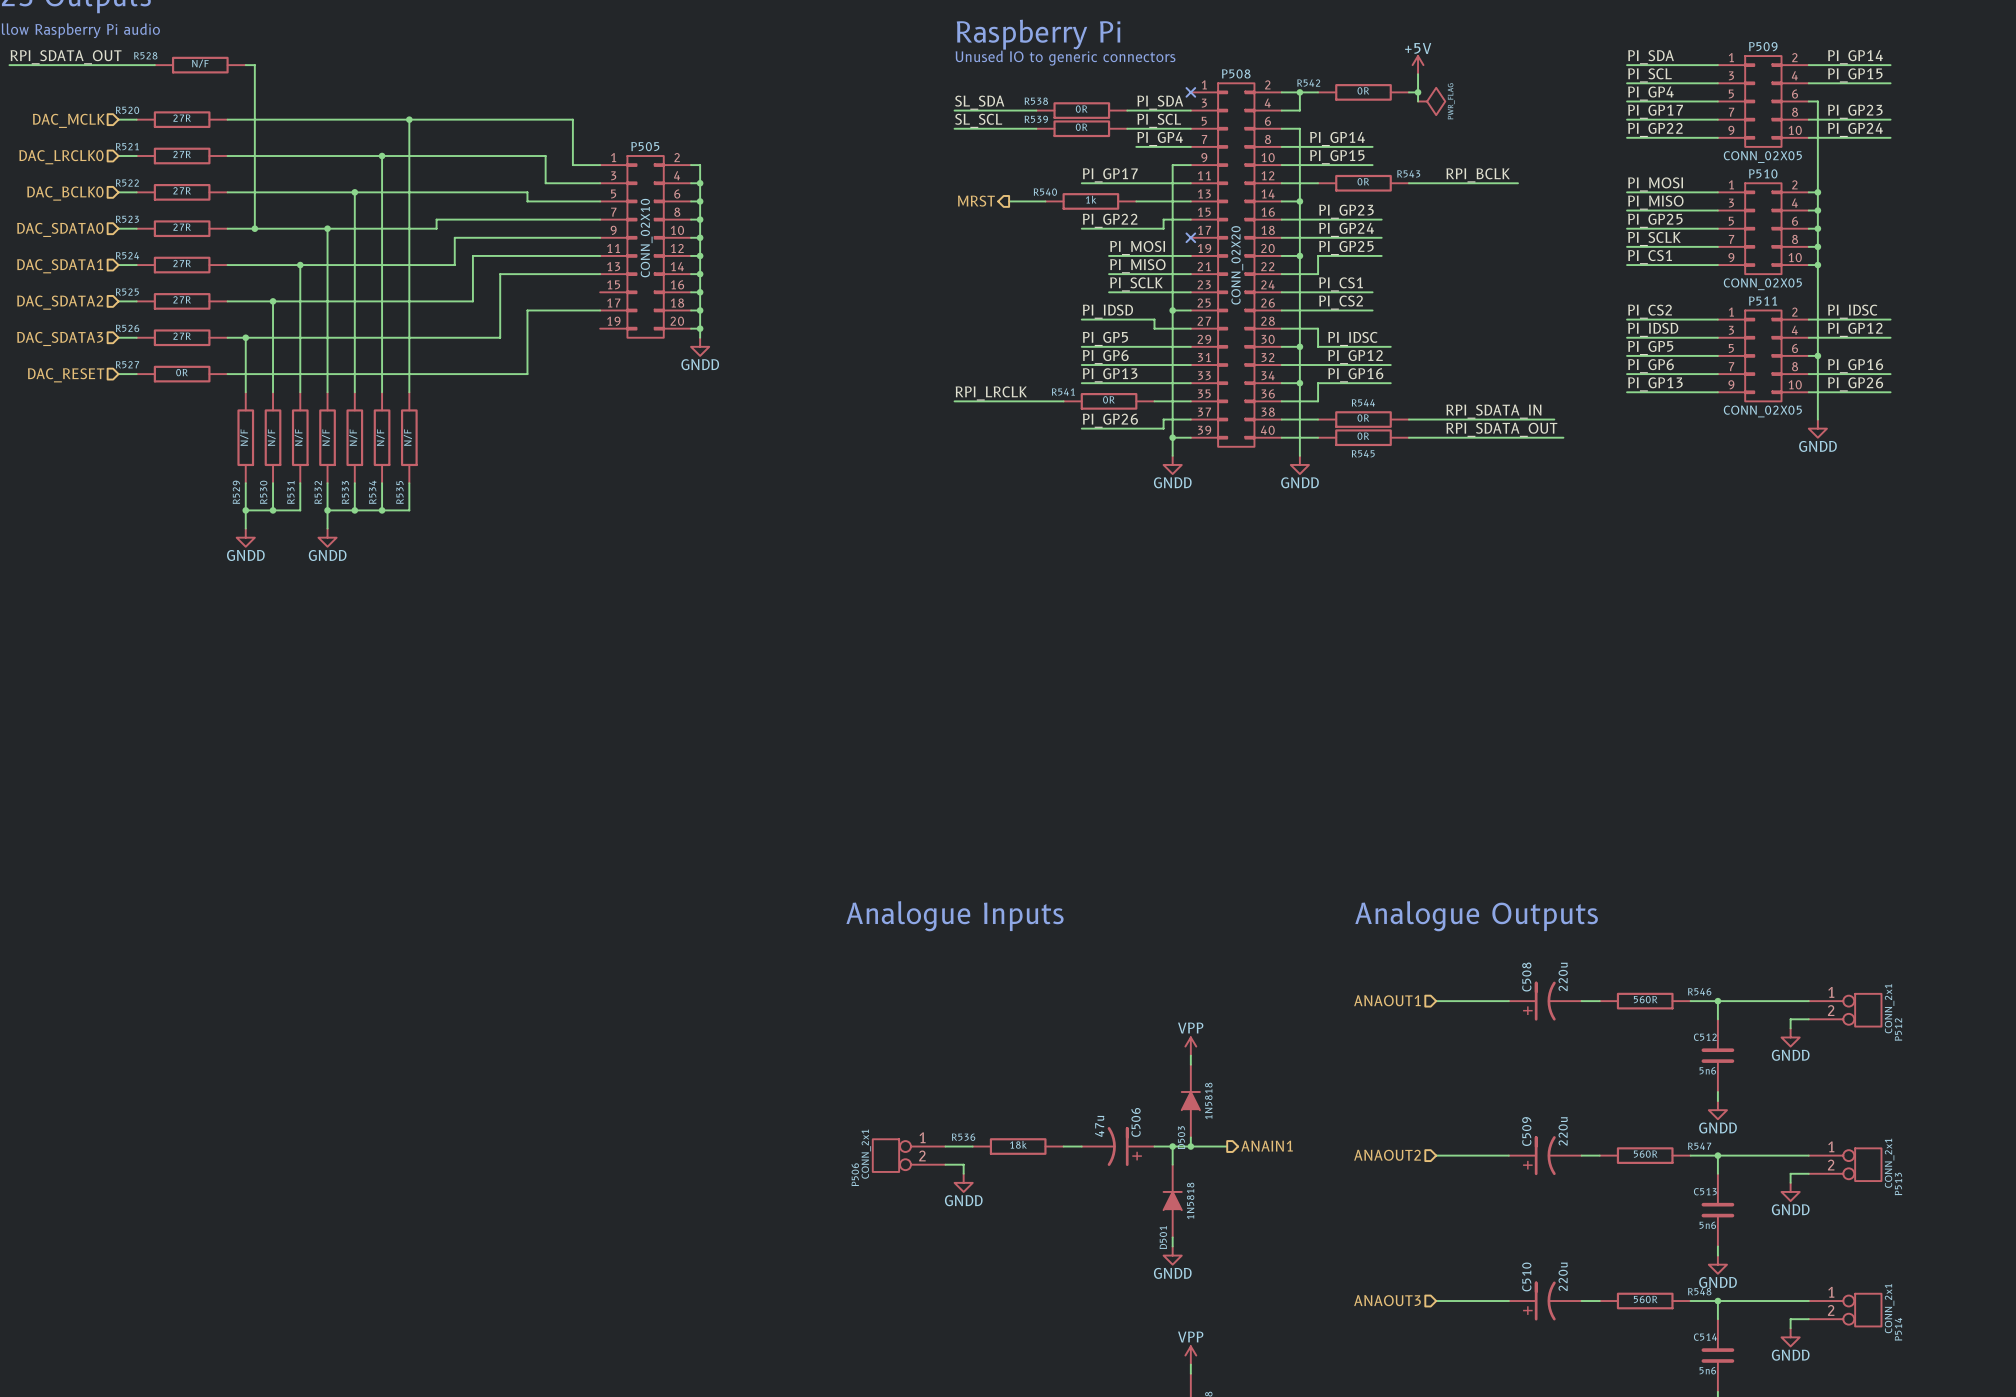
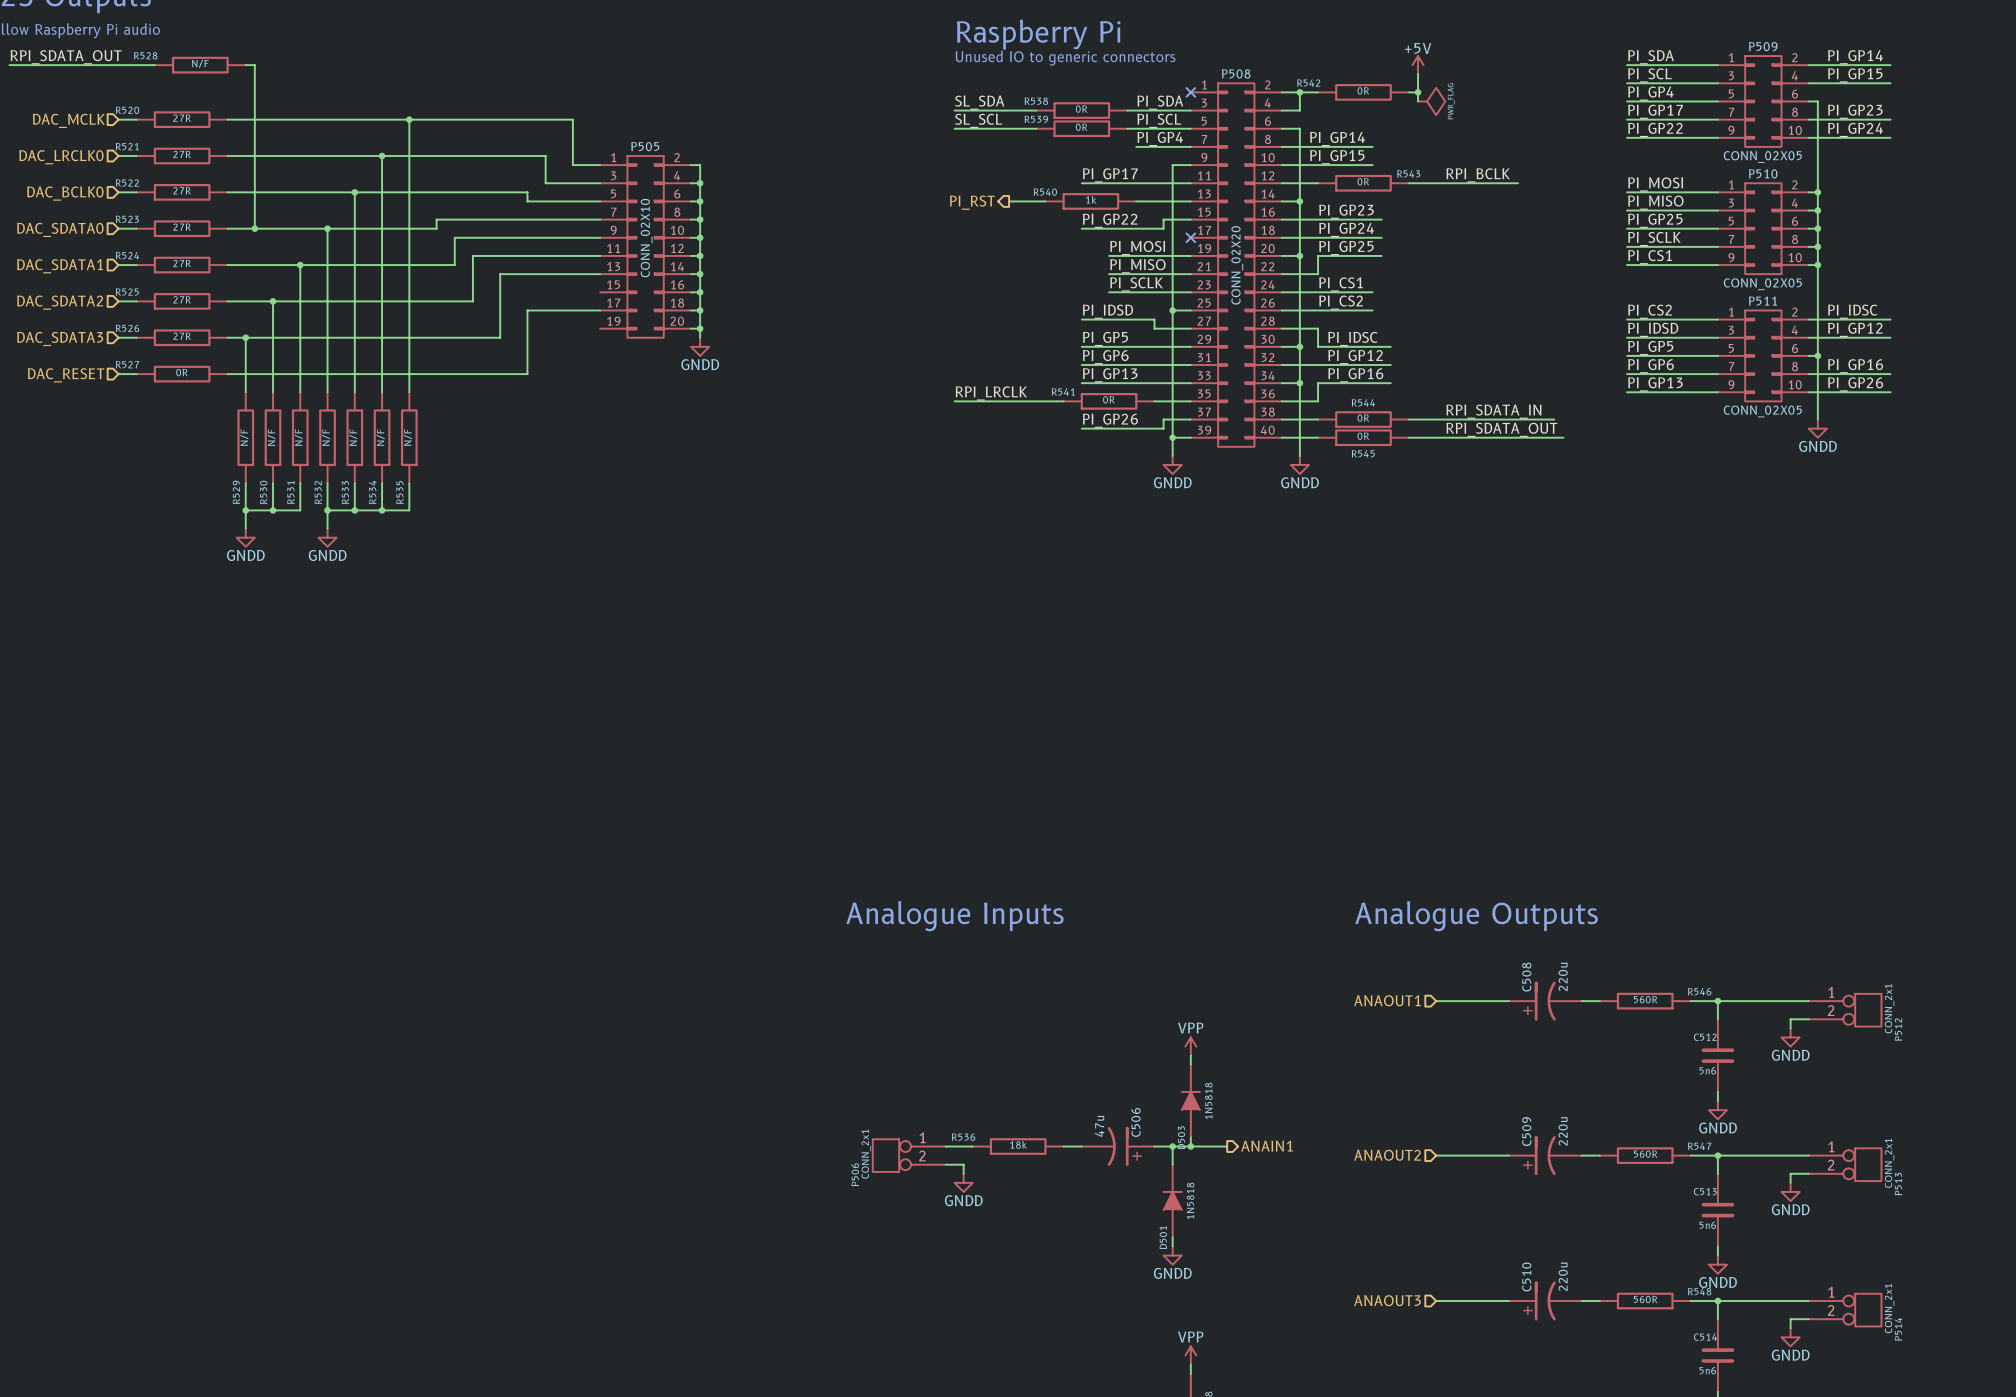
hierarchical label: MRST (976, 201) -> PI_RST (972, 202)

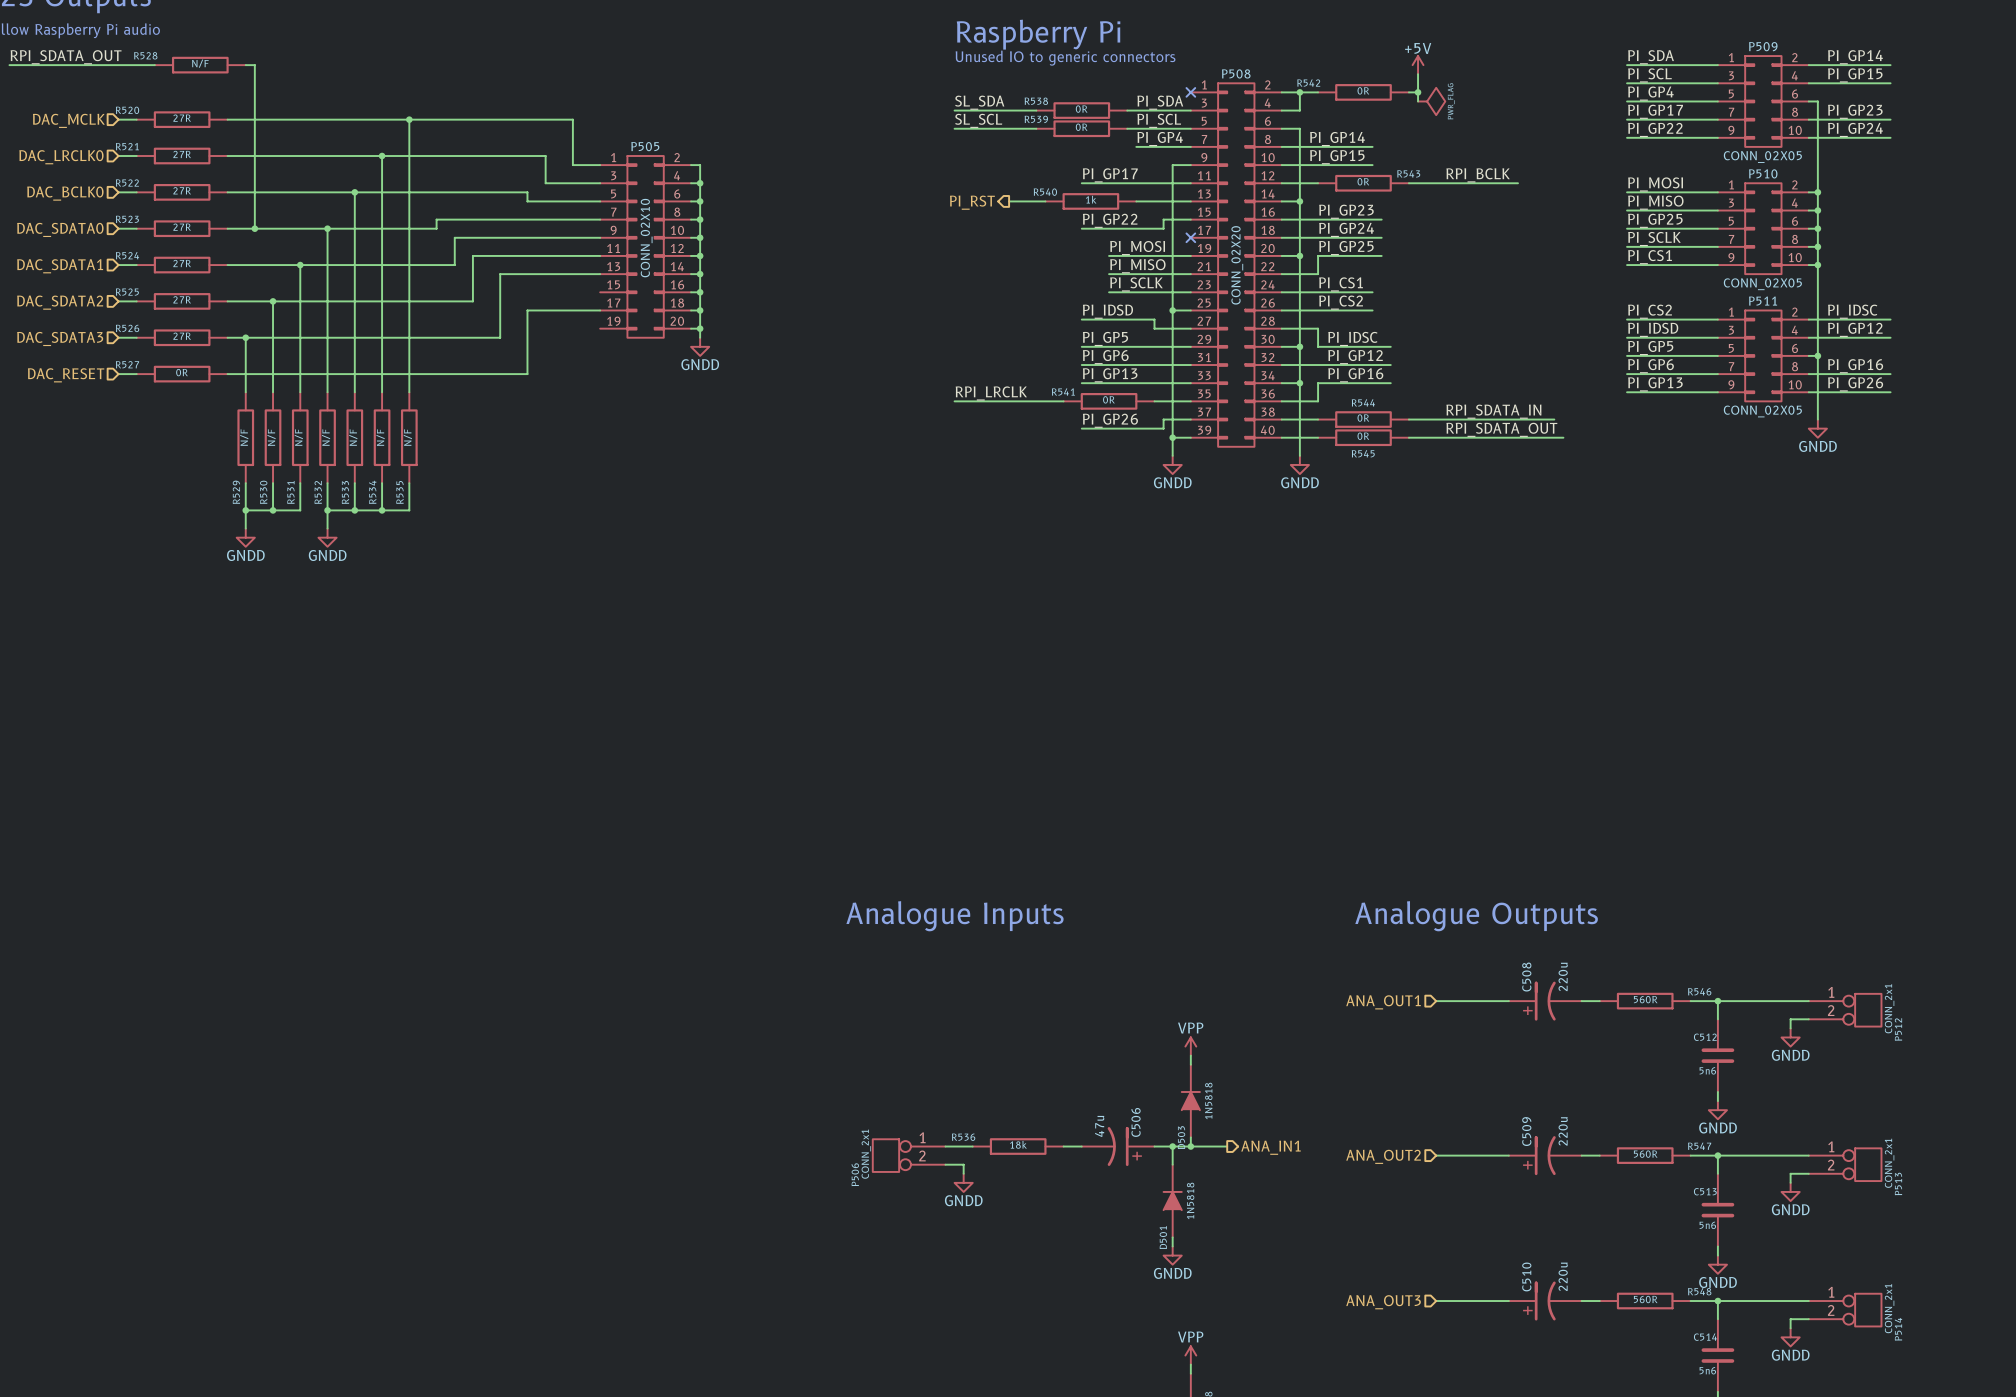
hierarchical label: ANAOUT1 (1387, 1000) -> ANA_OUT1 (1383, 1002)
hierarchical label: ANAIN1 (1267, 1146) -> ANA_IN1 (1271, 1147)
hierarchical label: ANAOUT2 (1387, 1155) -> ANA_OUT2 (1383, 1156)
hierarchical label: ANAOUT3 (1387, 1300) -> ANA_OUT3 (1383, 1302)

